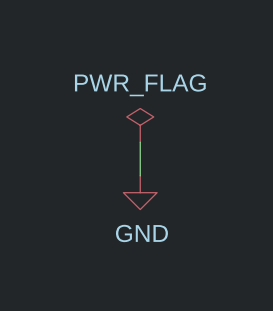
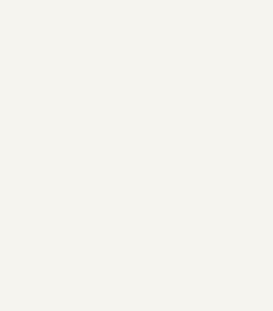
power symbol: PWR_FLAG (140, 125) -> none
wire: (140, 142) (140, 175) -> none
power symbol: GND (140, 192) -> none

